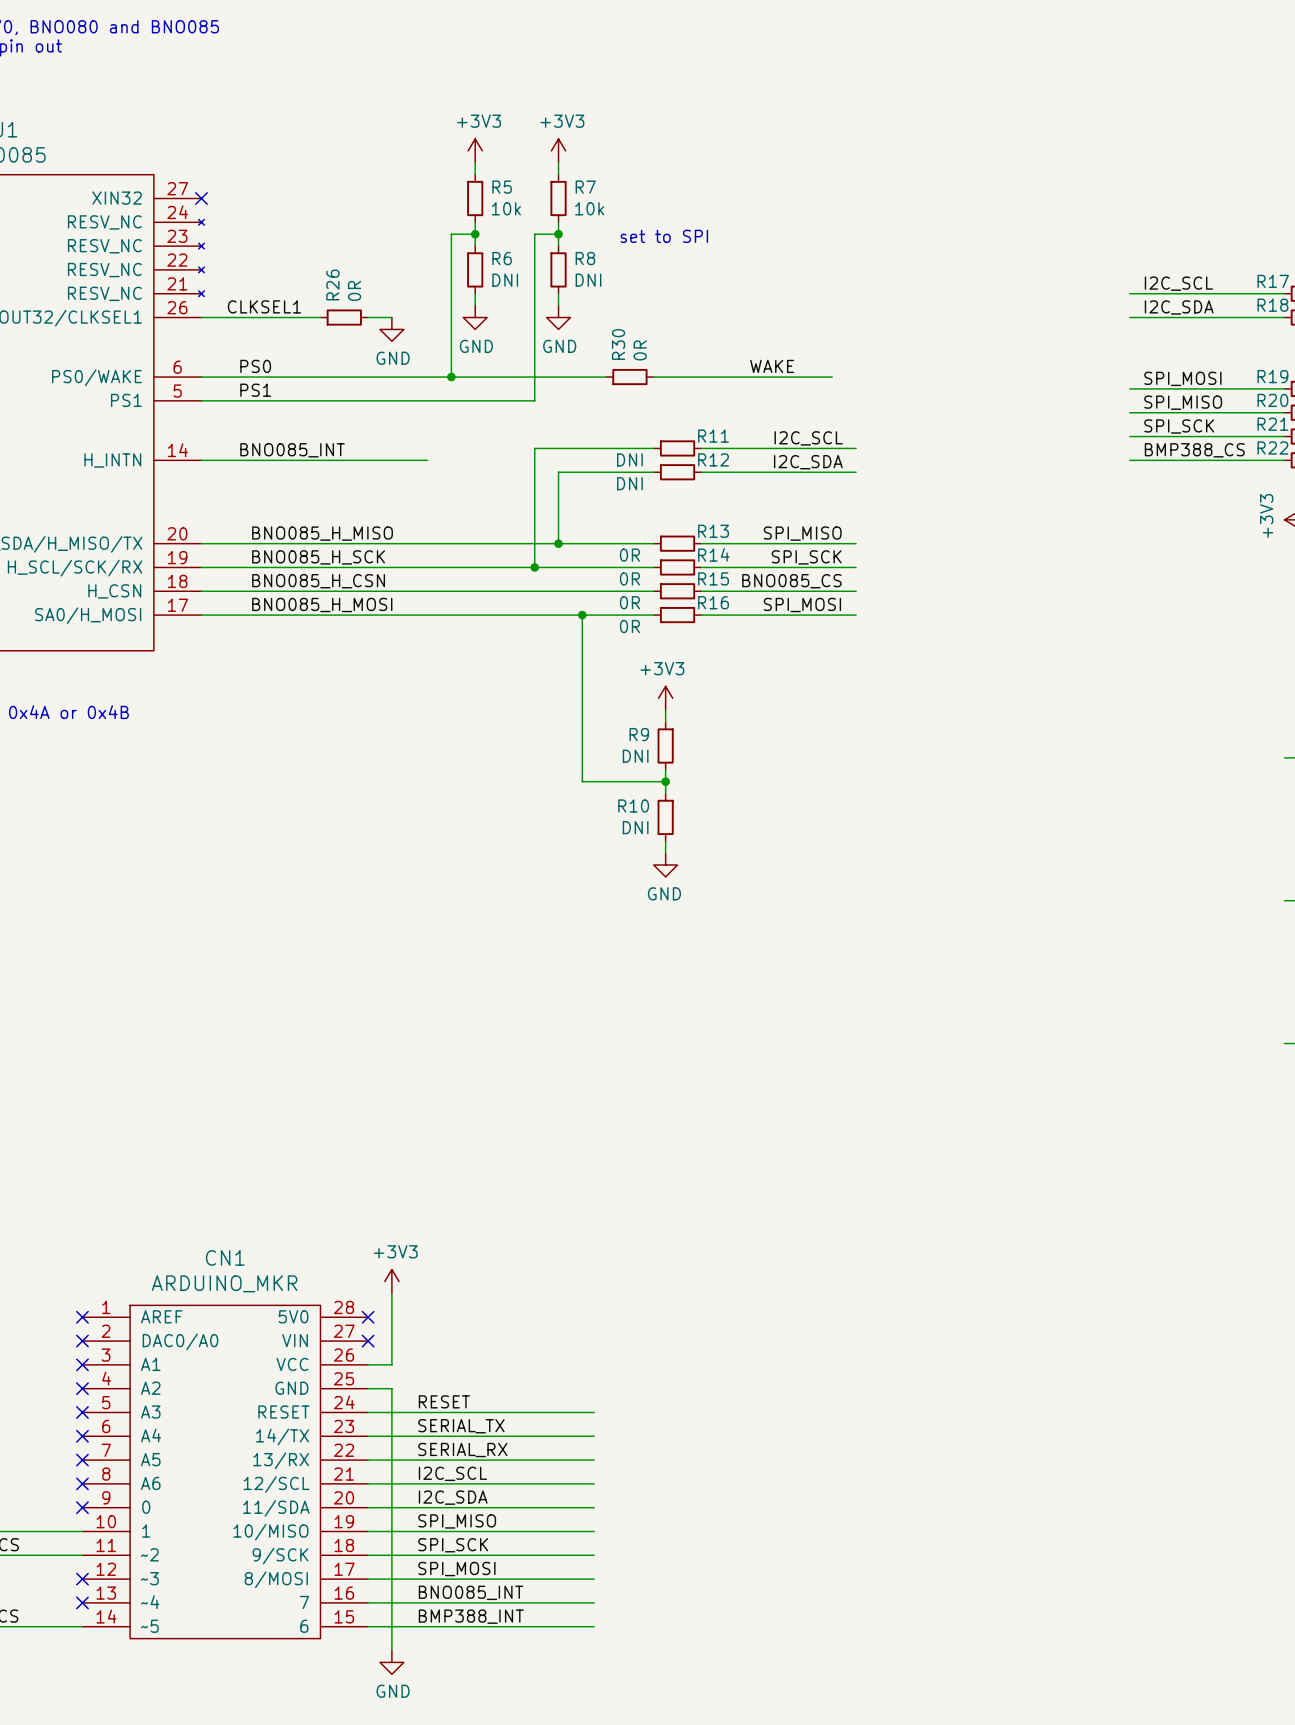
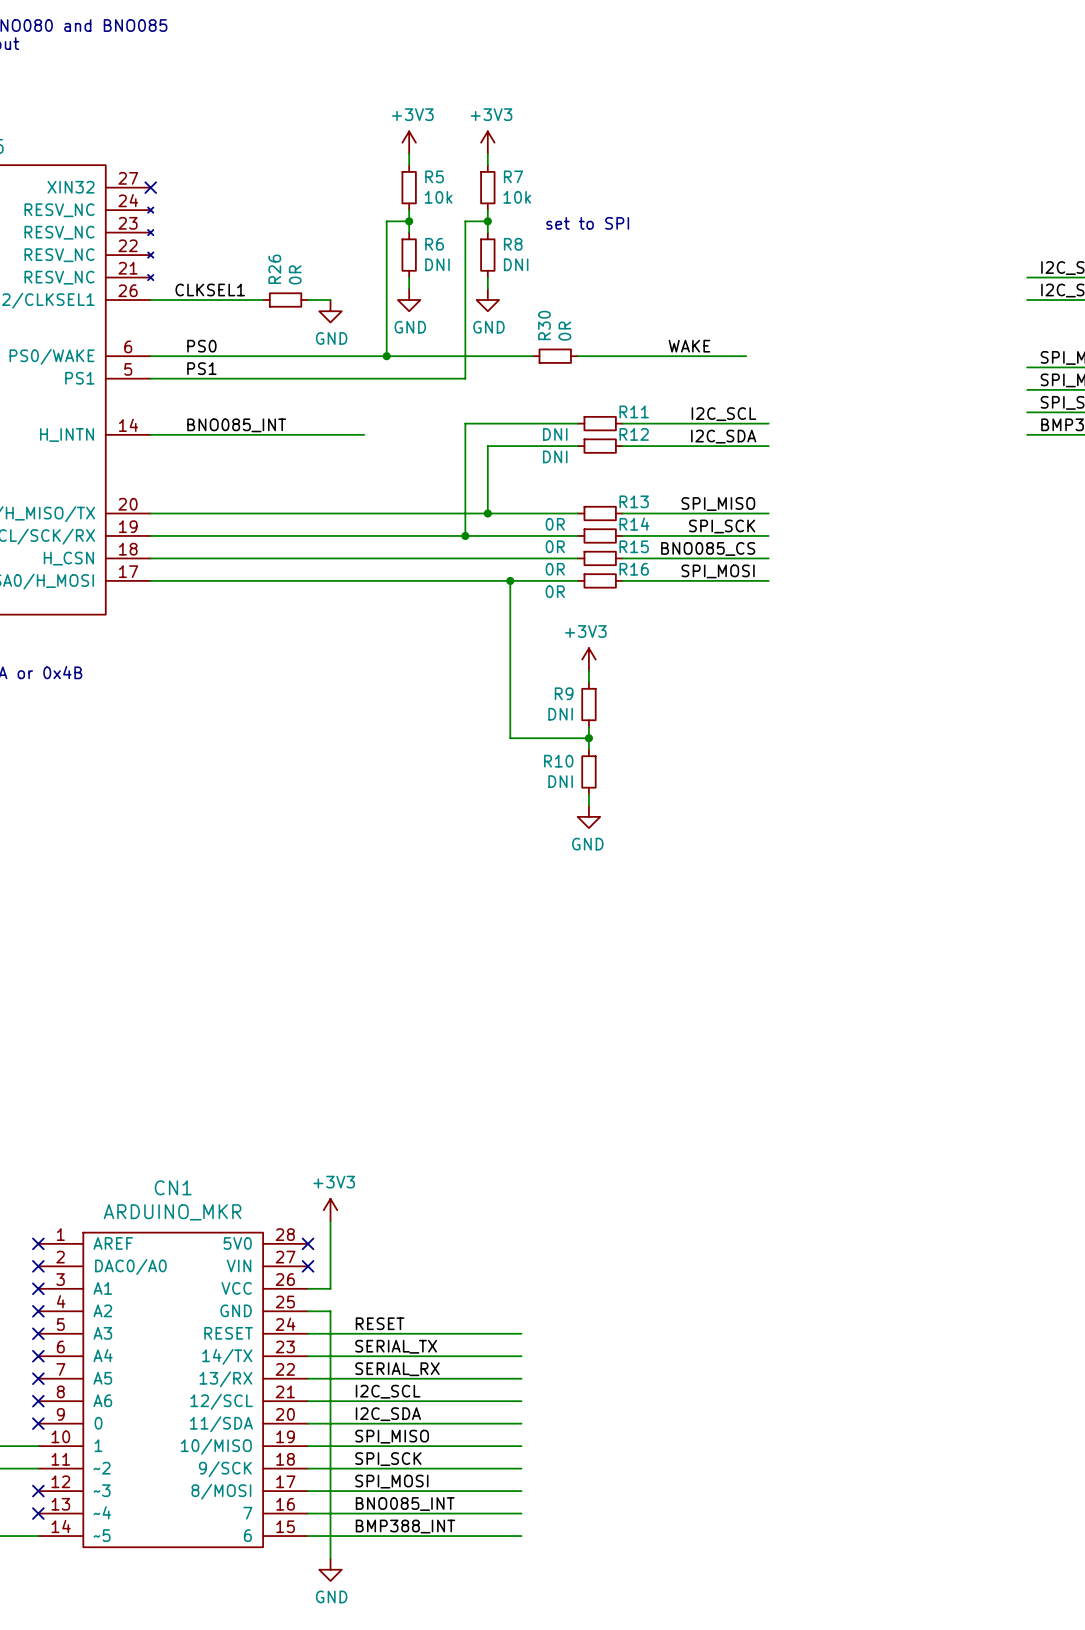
label: BNO085_H_MISO (322, 533) -> none
label: BNO085_H_SCK (318, 557) -> none
label: BNO085_H_CSN (318, 581) -> none
label: BNO085_H_MOSI (322, 605) -> none

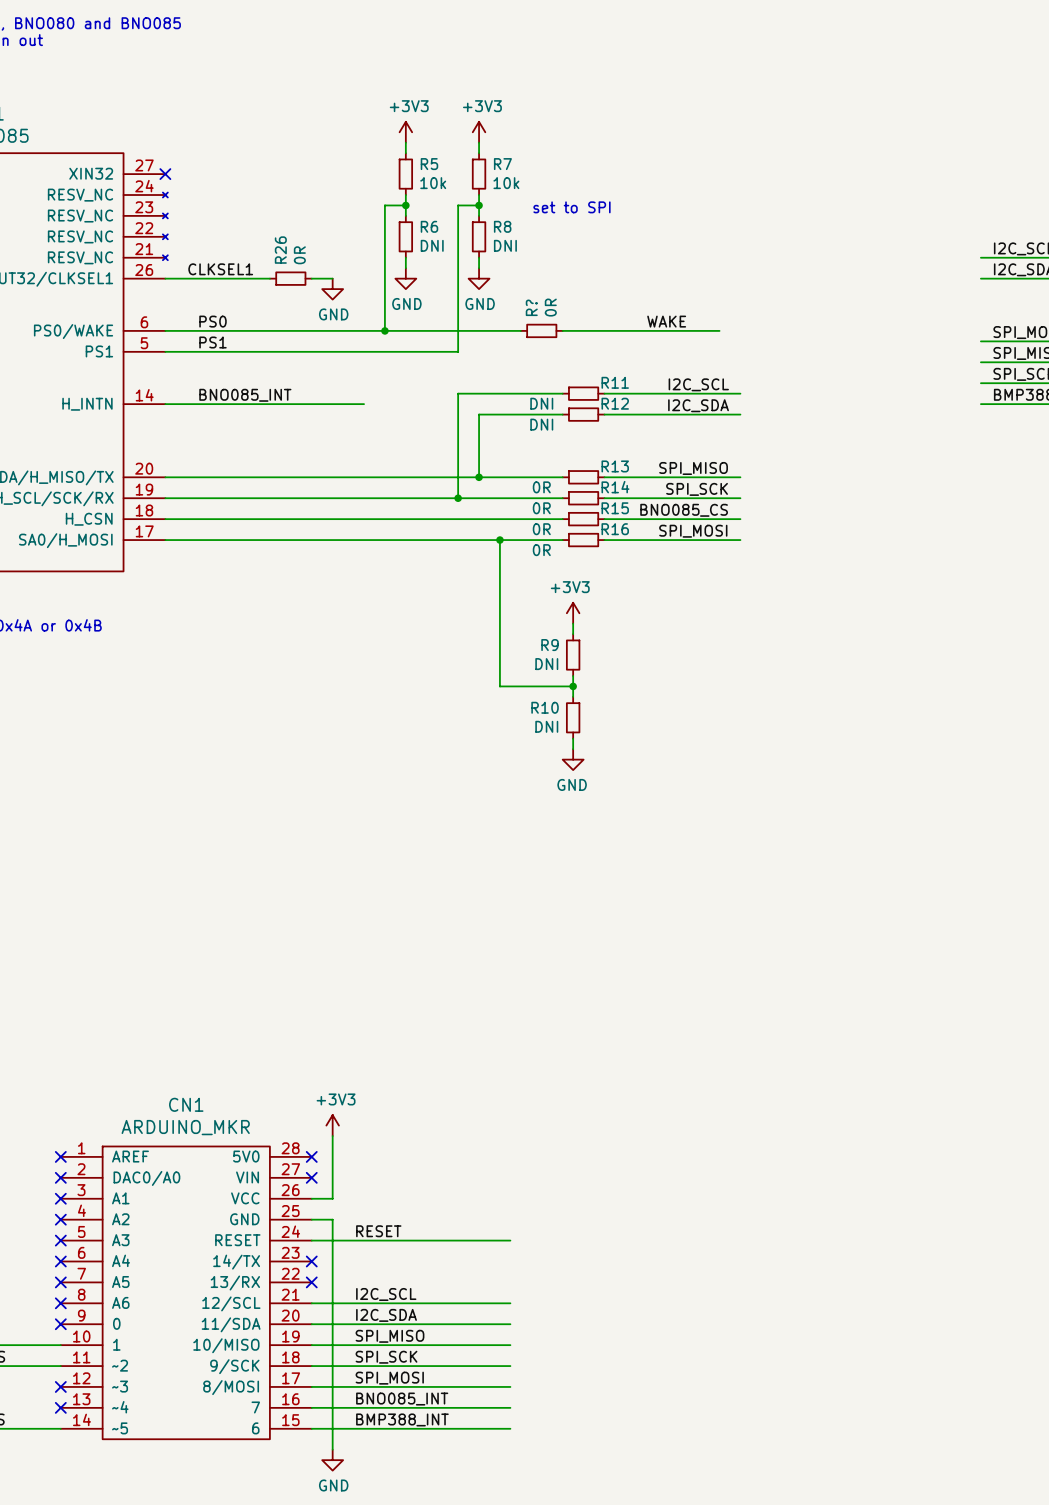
R30 name: R30 (544, 325) -> R? (531, 307)
label: SERIAL_TX (396, 1346) -> none
wire: (308, 1356) (521, 1356) -> none
no-connect mark: none -> (311, 1261)
label: SERIAL_RX (397, 1369) -> none
wire: (308, 1378) (521, 1378) -> none
no-connect mark: none -> (311, 1282)

